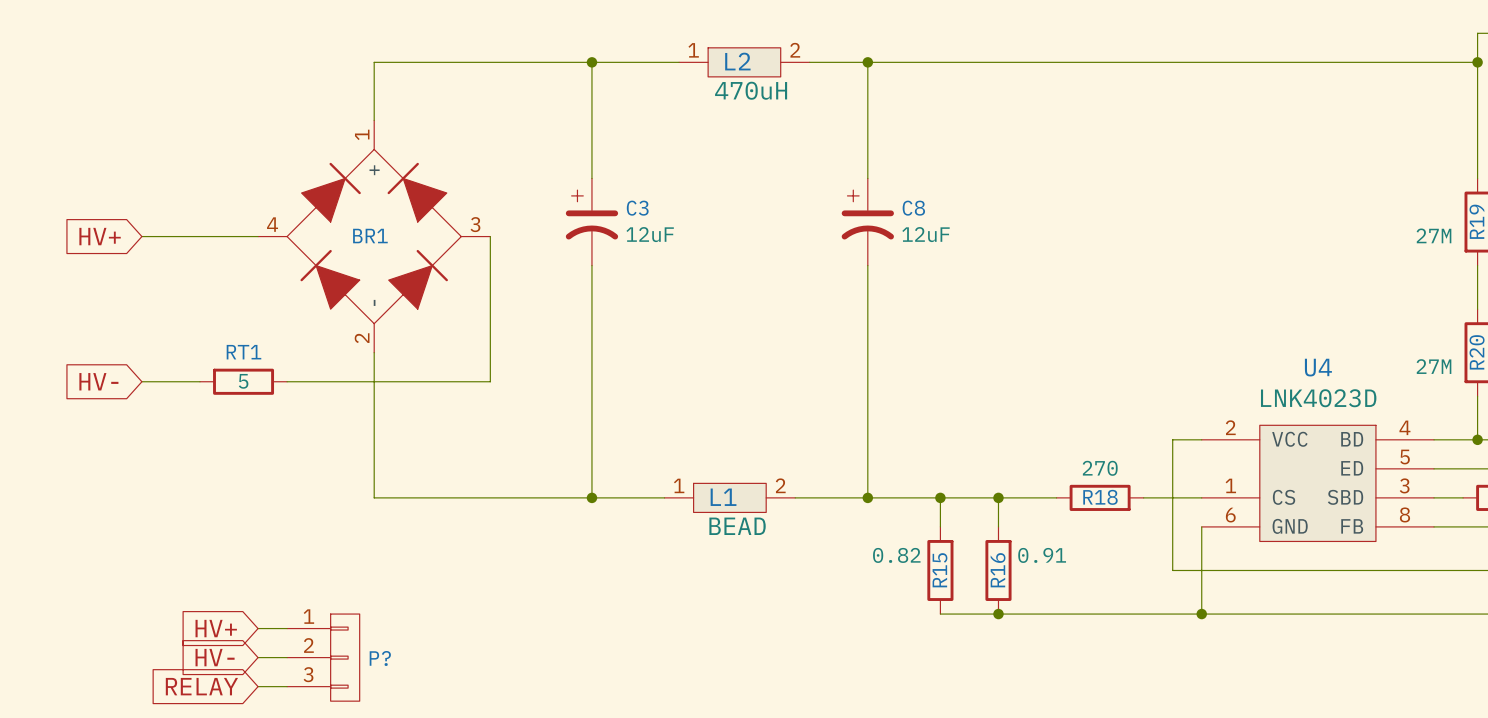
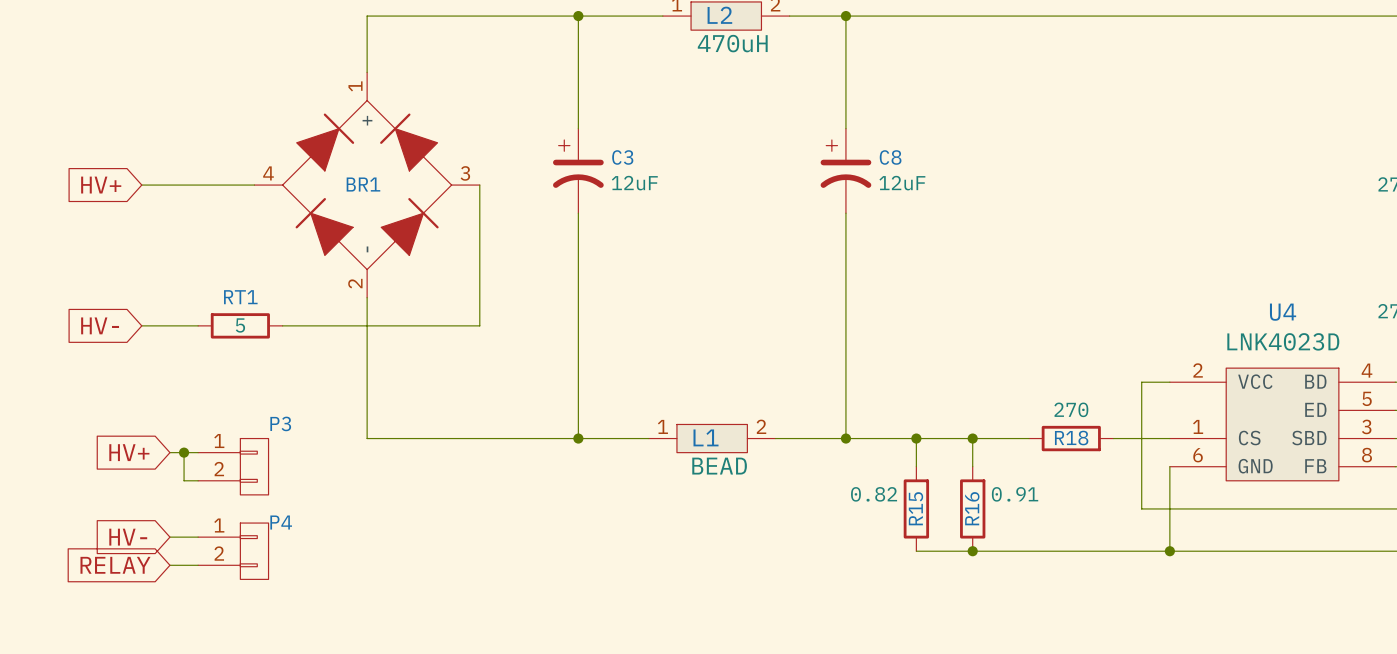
wire: none -> (184, 452) (184, 480) (198, 480)
junction: none -> (184, 452)
P3: none -> (233, 466)
P4: none -> (233, 551)
global label position: HV+ (216, 628) -> HV+ (129, 452)
wire: (258, 628) (287, 628) -> (169, 565) (198, 565)
global label position: HV- (215, 657) -> HV- (128, 537)
wire: (258, 657) (287, 657) -> (169, 537) (198, 537)
P?: (323, 657) -> none
global label position: RELAY (201, 686) -> RELAY (115, 565)
wire: (258, 686) (287, 686) -> (169, 452) (198, 452)

